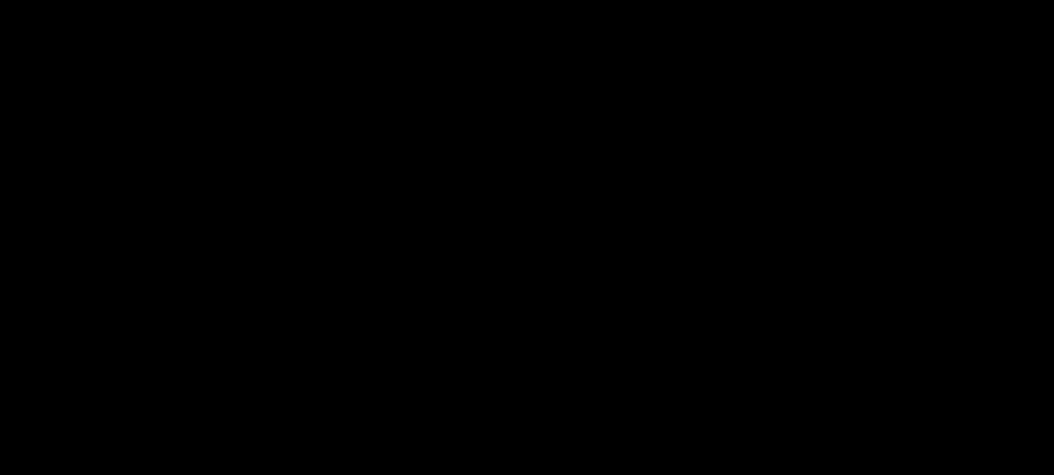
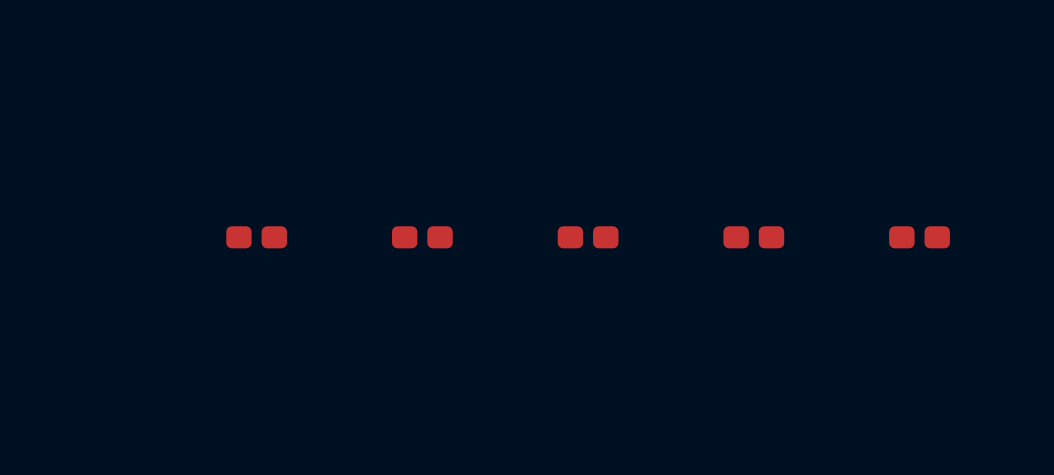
part: none -> (256, 237)
part: none -> (422, 237)
part: none -> (588, 237)
part: none -> (753, 237)
part: none -> (919, 237)

